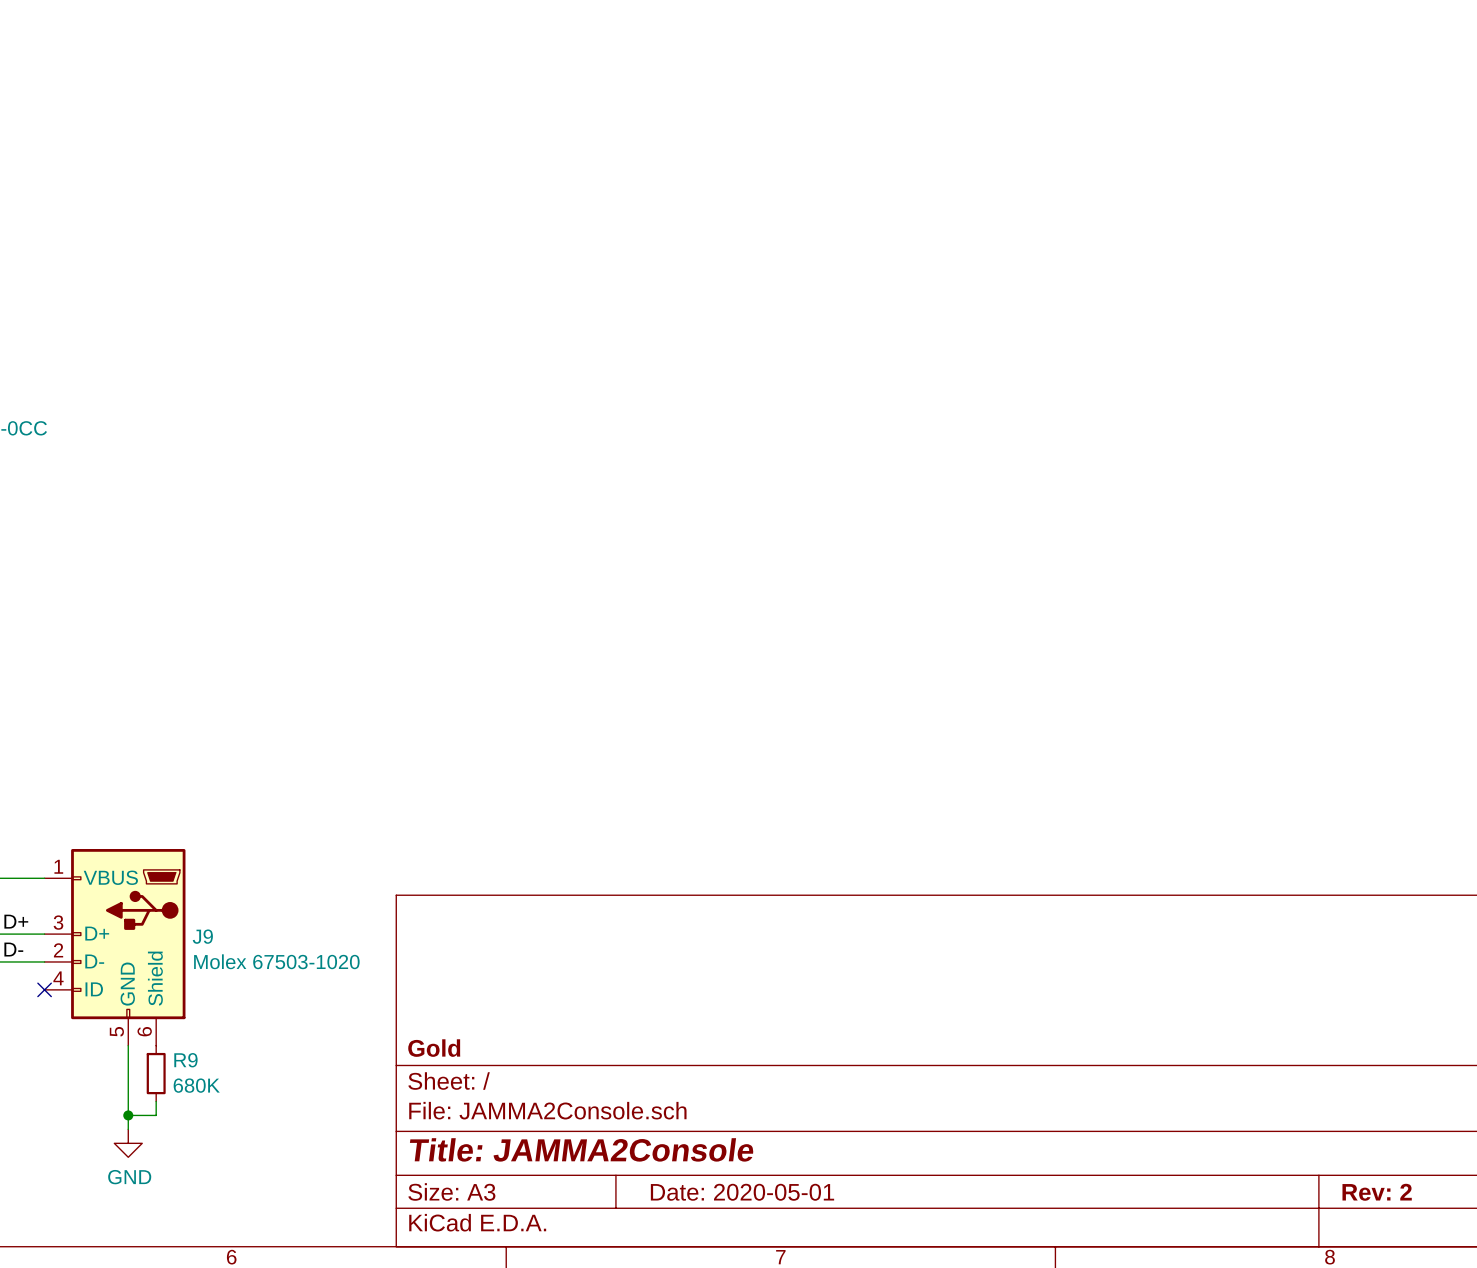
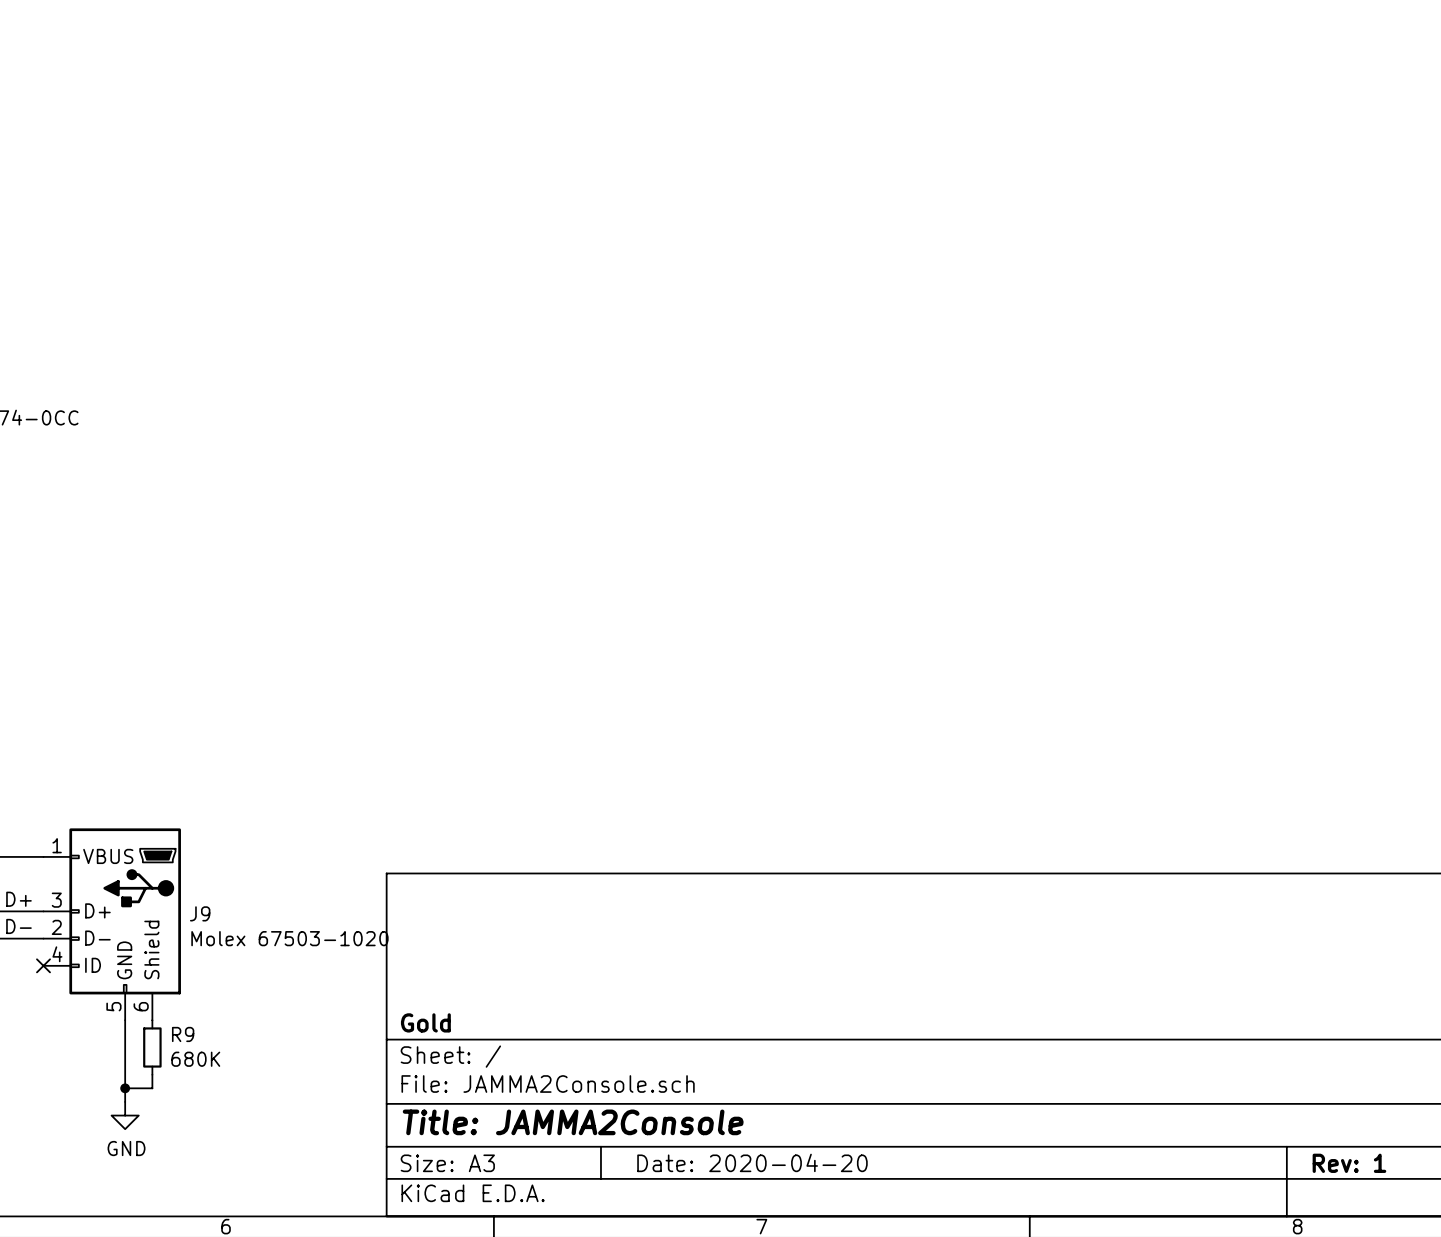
title block: Date: 2020-05-01 (742, 1192) -> Date: 2020-04-20 (752, 1162)
title block: Rev: 2 (1377, 1192) -> Rev: 1 (1349, 1163)

